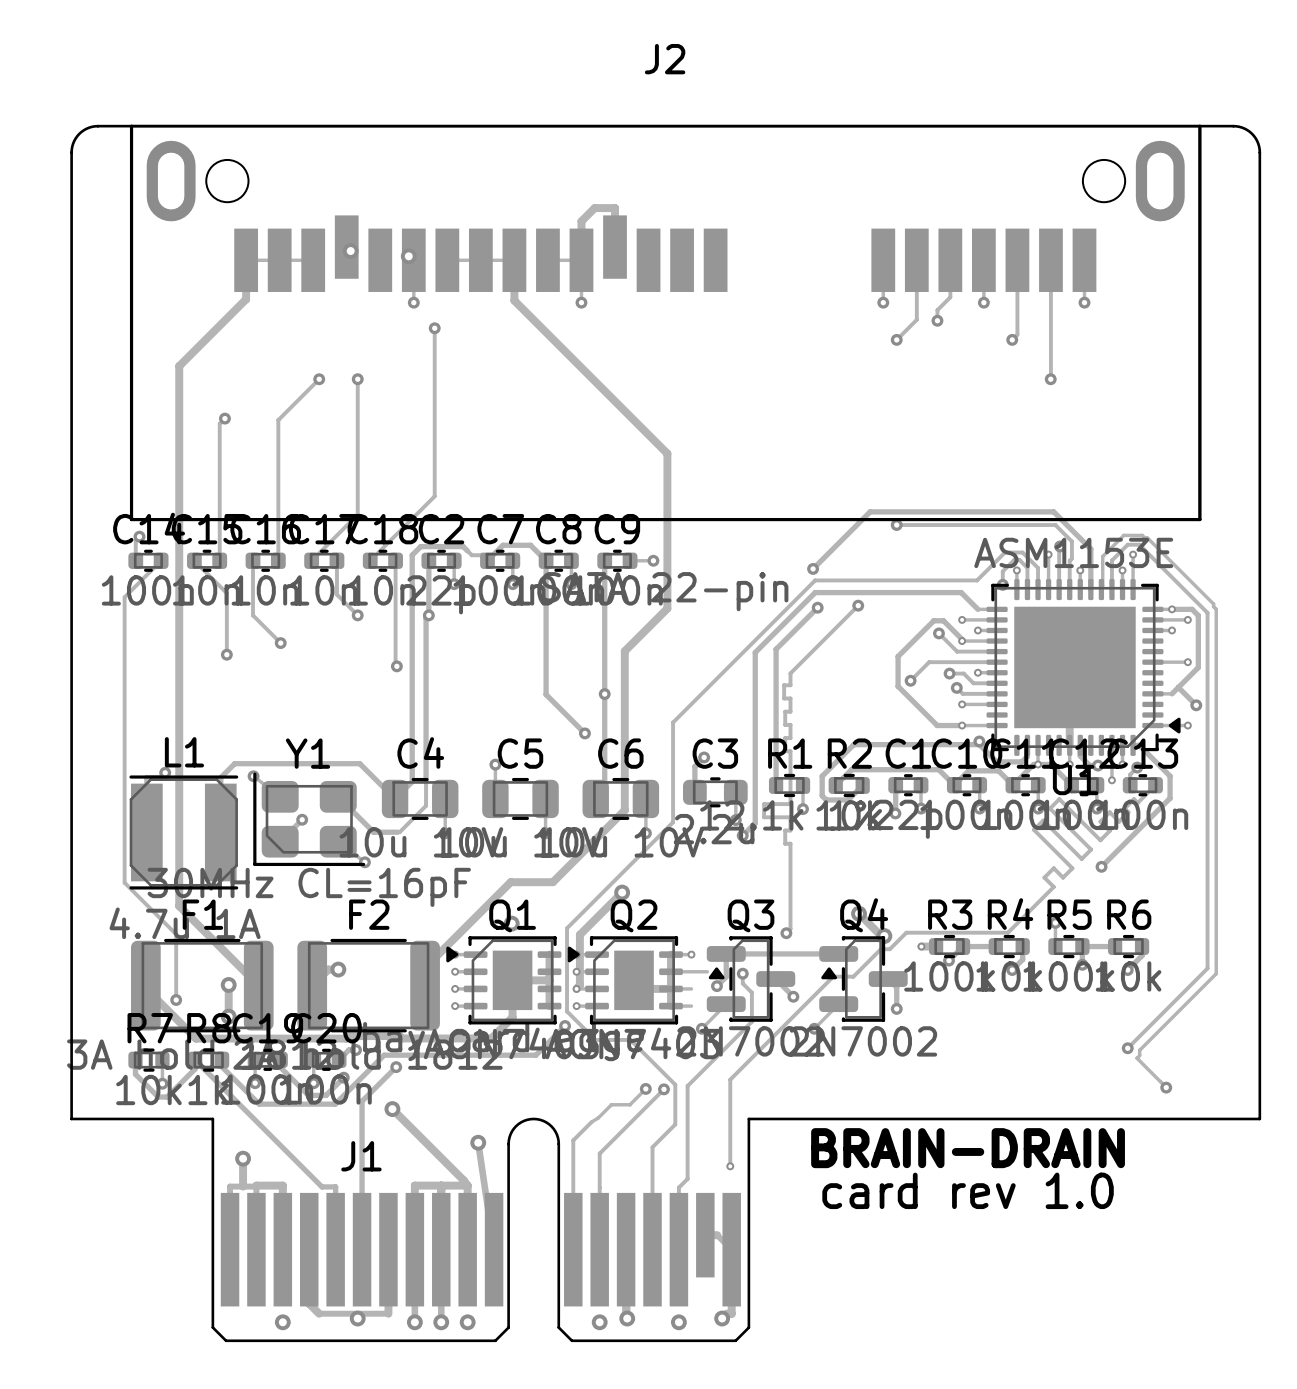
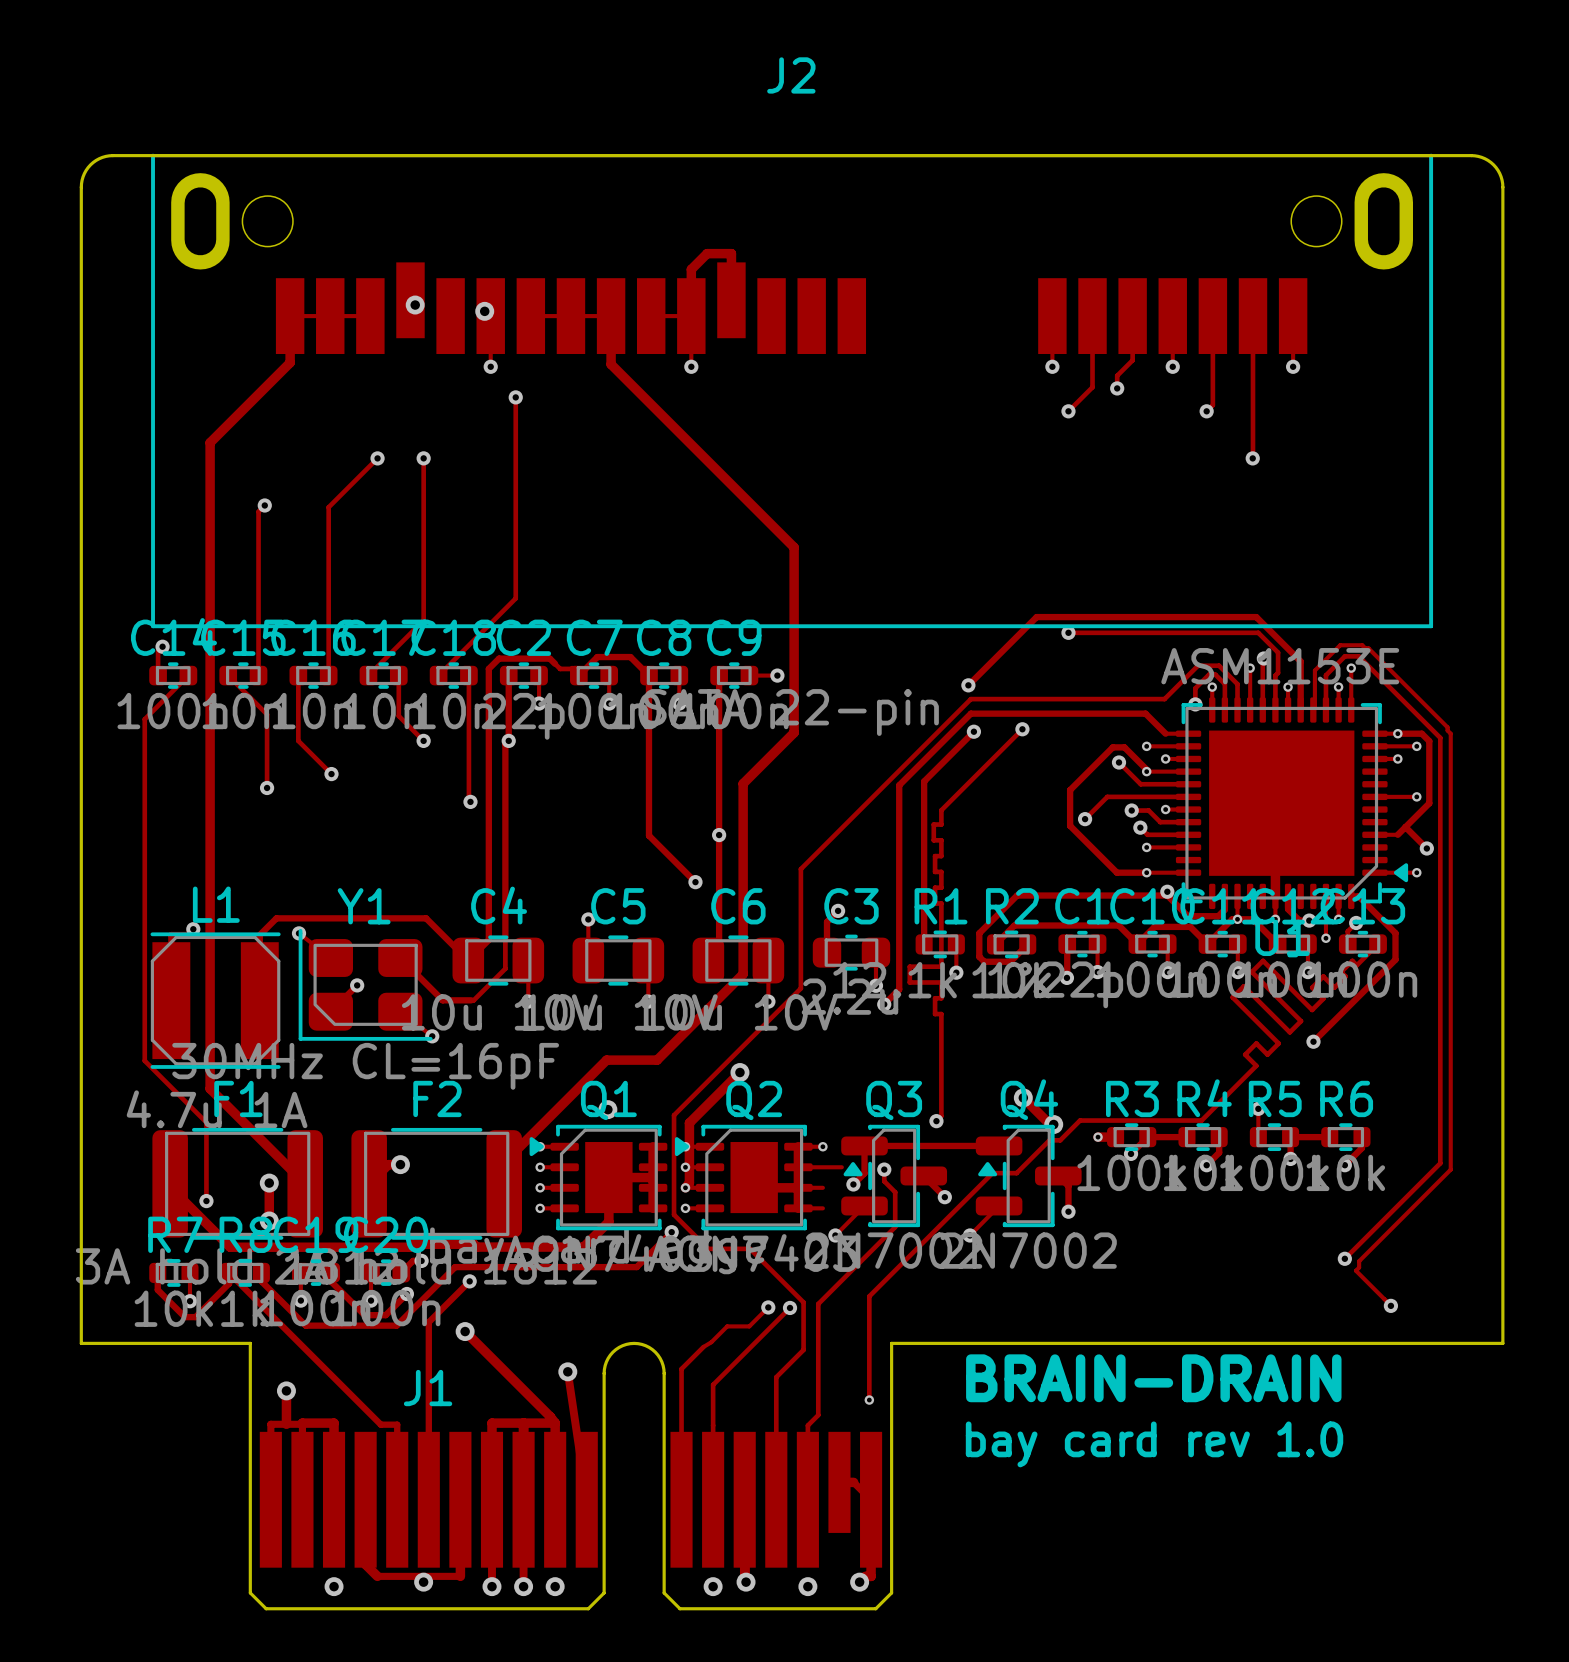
text: card rev 1.0 (968, 1190) -> bay card rev 1.0 (1154, 1444)

